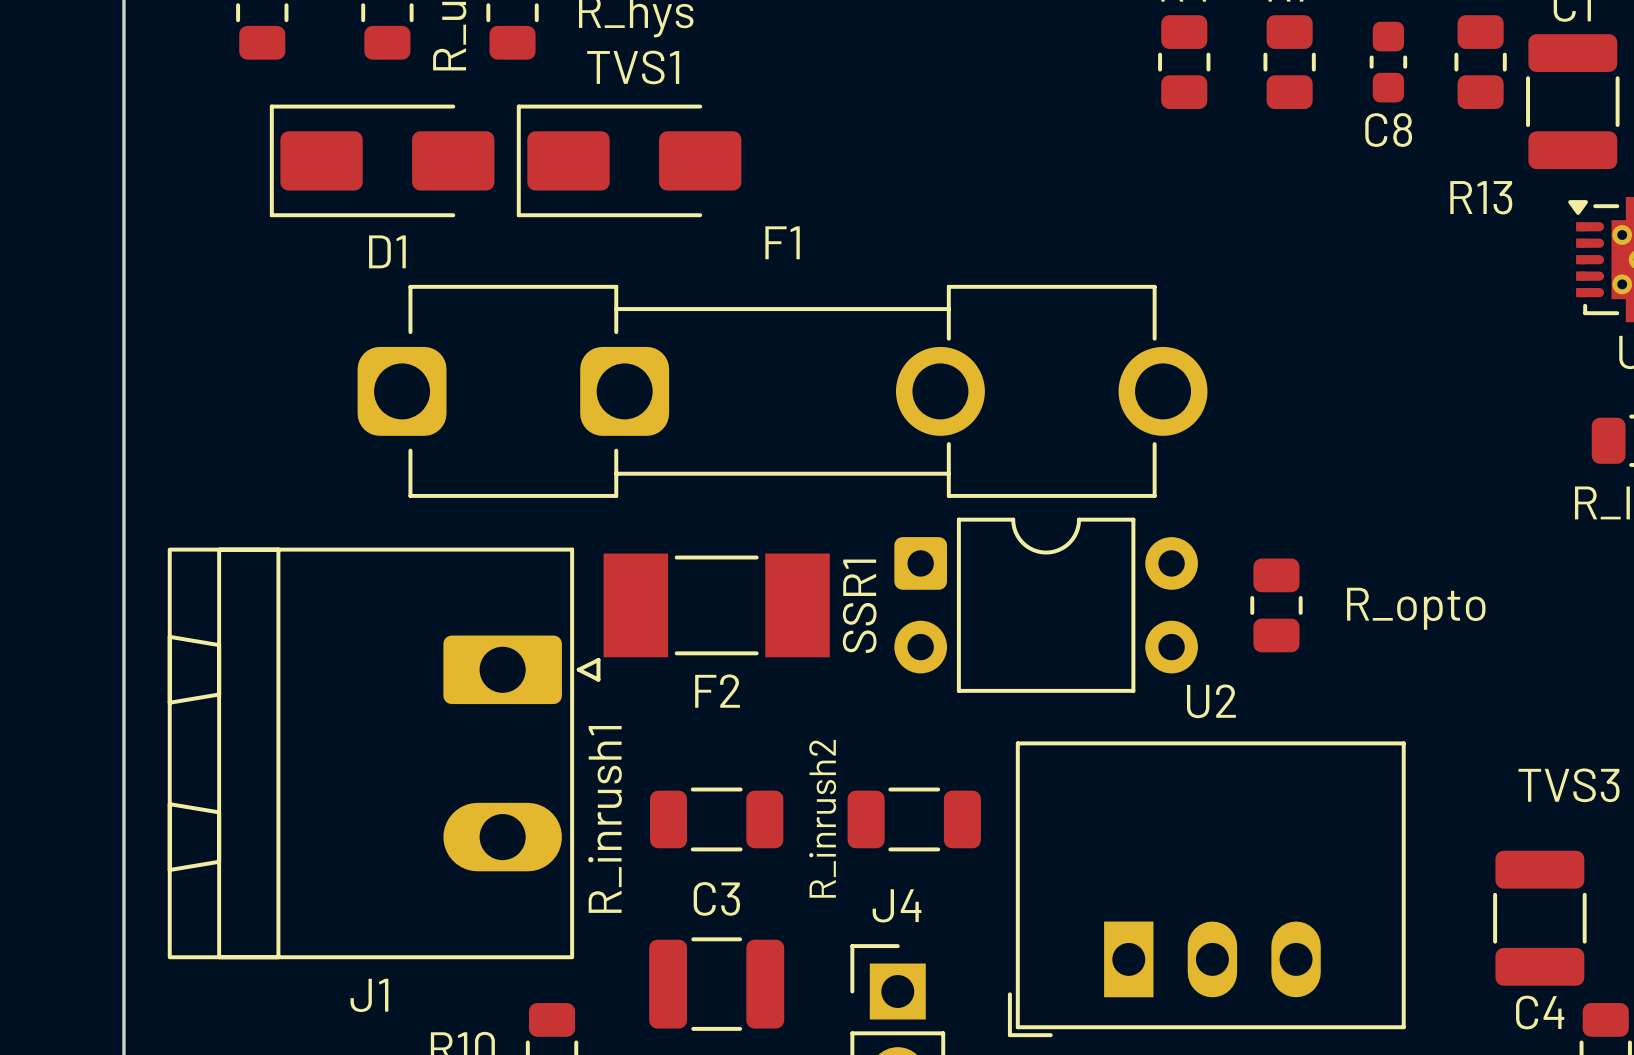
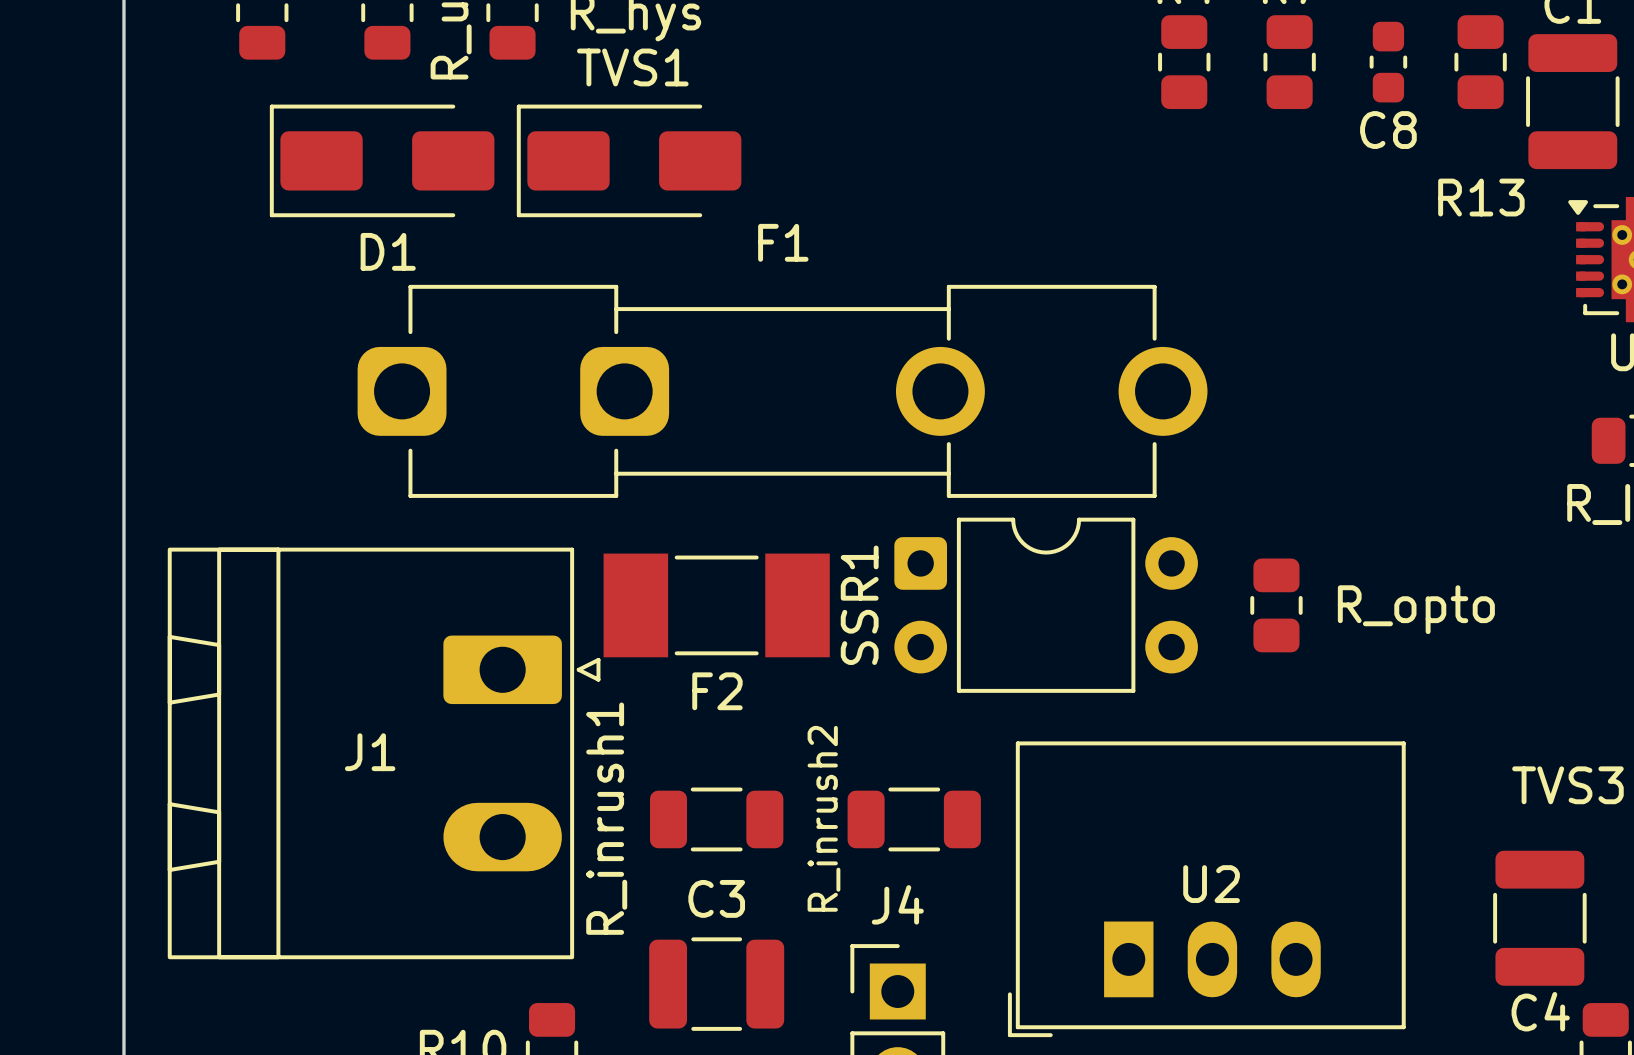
U2 name position: U2 (1211, 701) -> U2 (1211, 884)
J1 name position: J1 (369, 995) -> J1 (370, 752)

